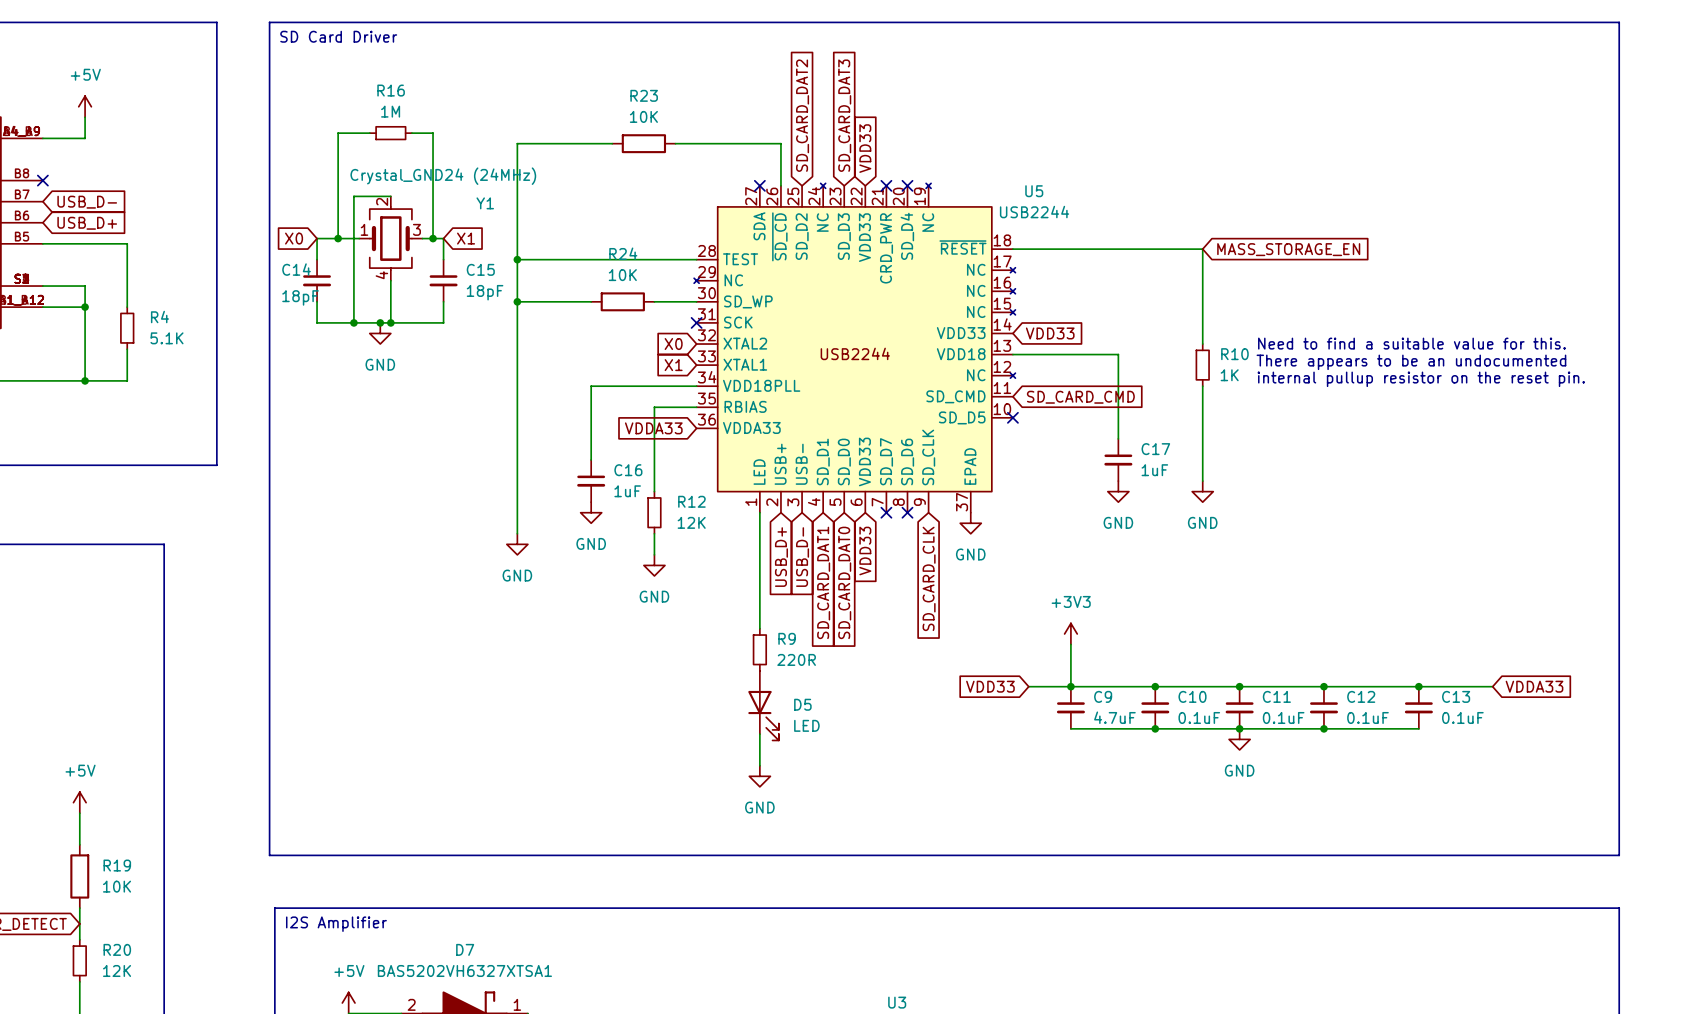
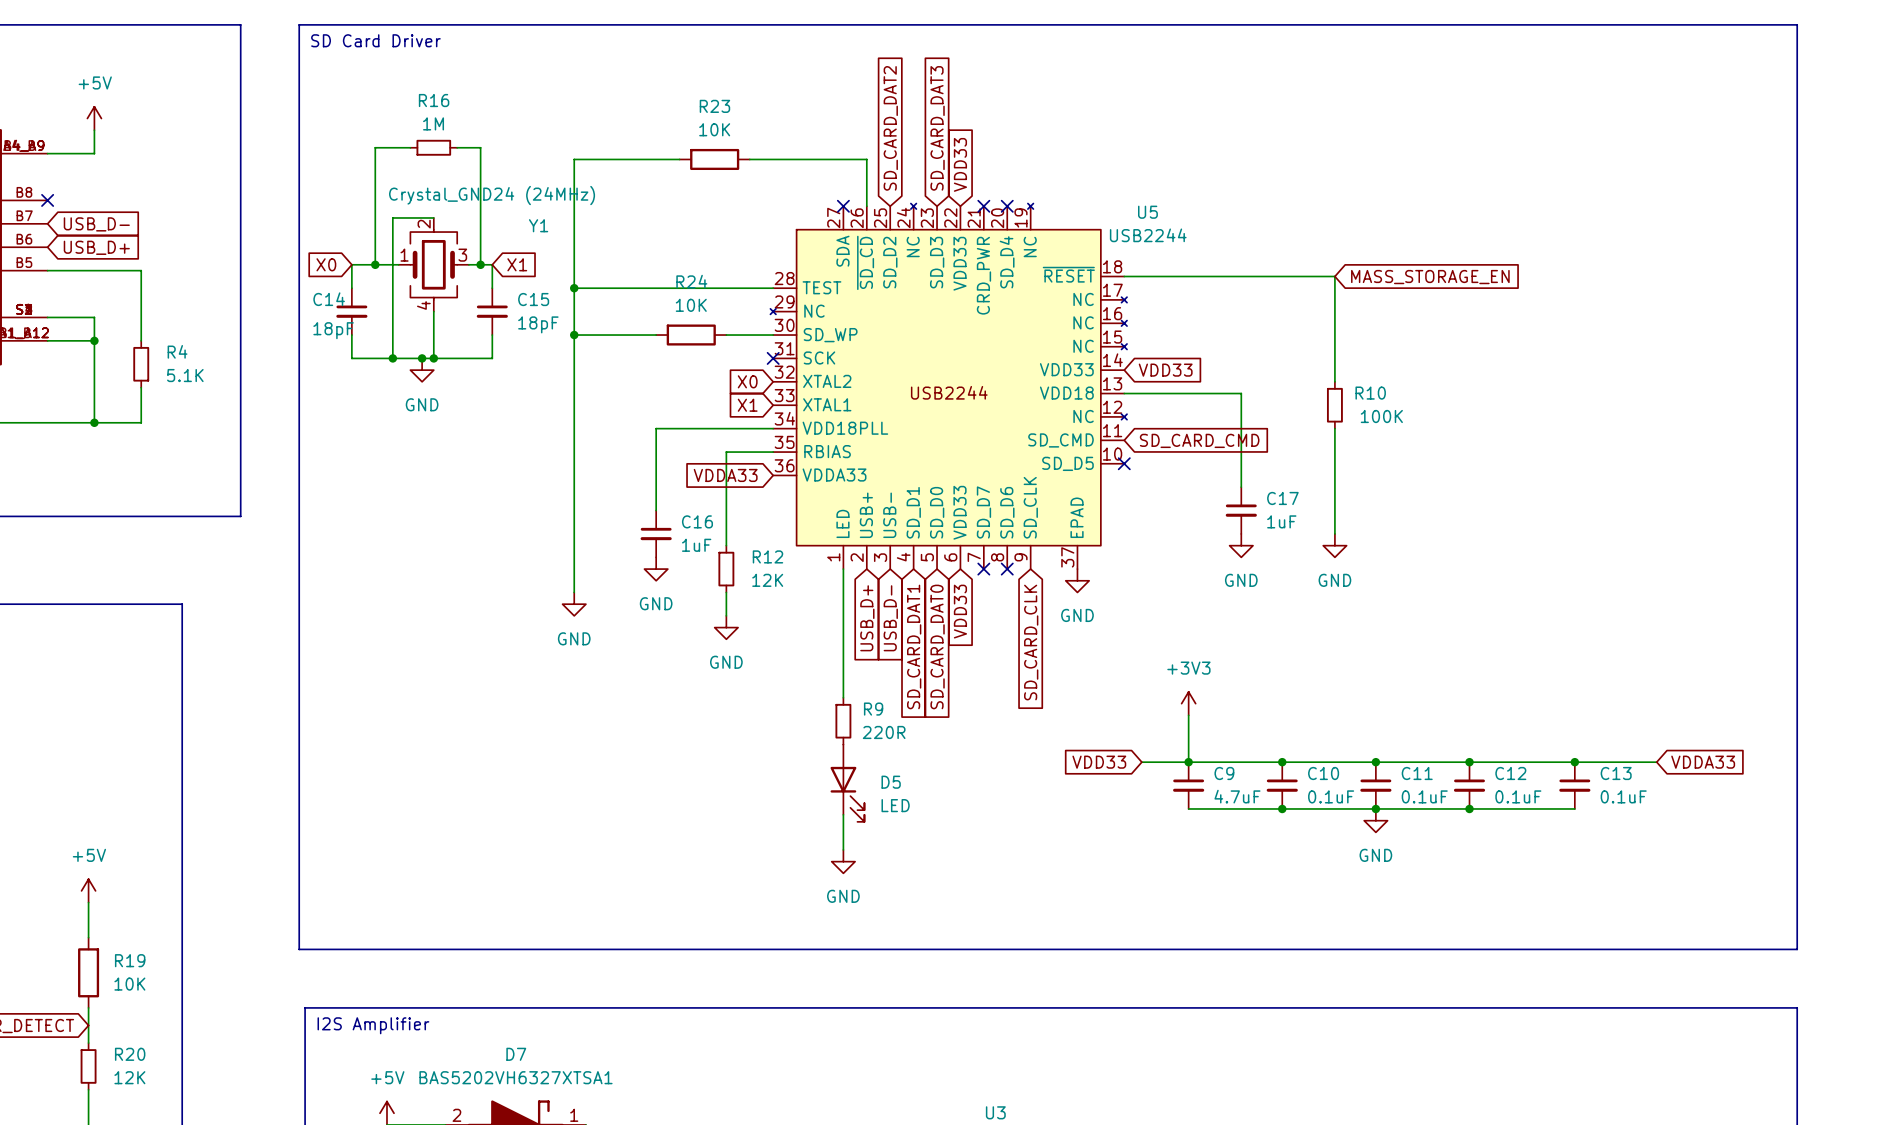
text: Need to find a suitable value for this. (1411, 343) -> none
text: There appears to be an undocumented (1411, 362) -> none
R10 value: 1K (1229, 375) -> 100K (1381, 416)
text: internal pullup resistor on the reset pin. (1421, 379) -> none

